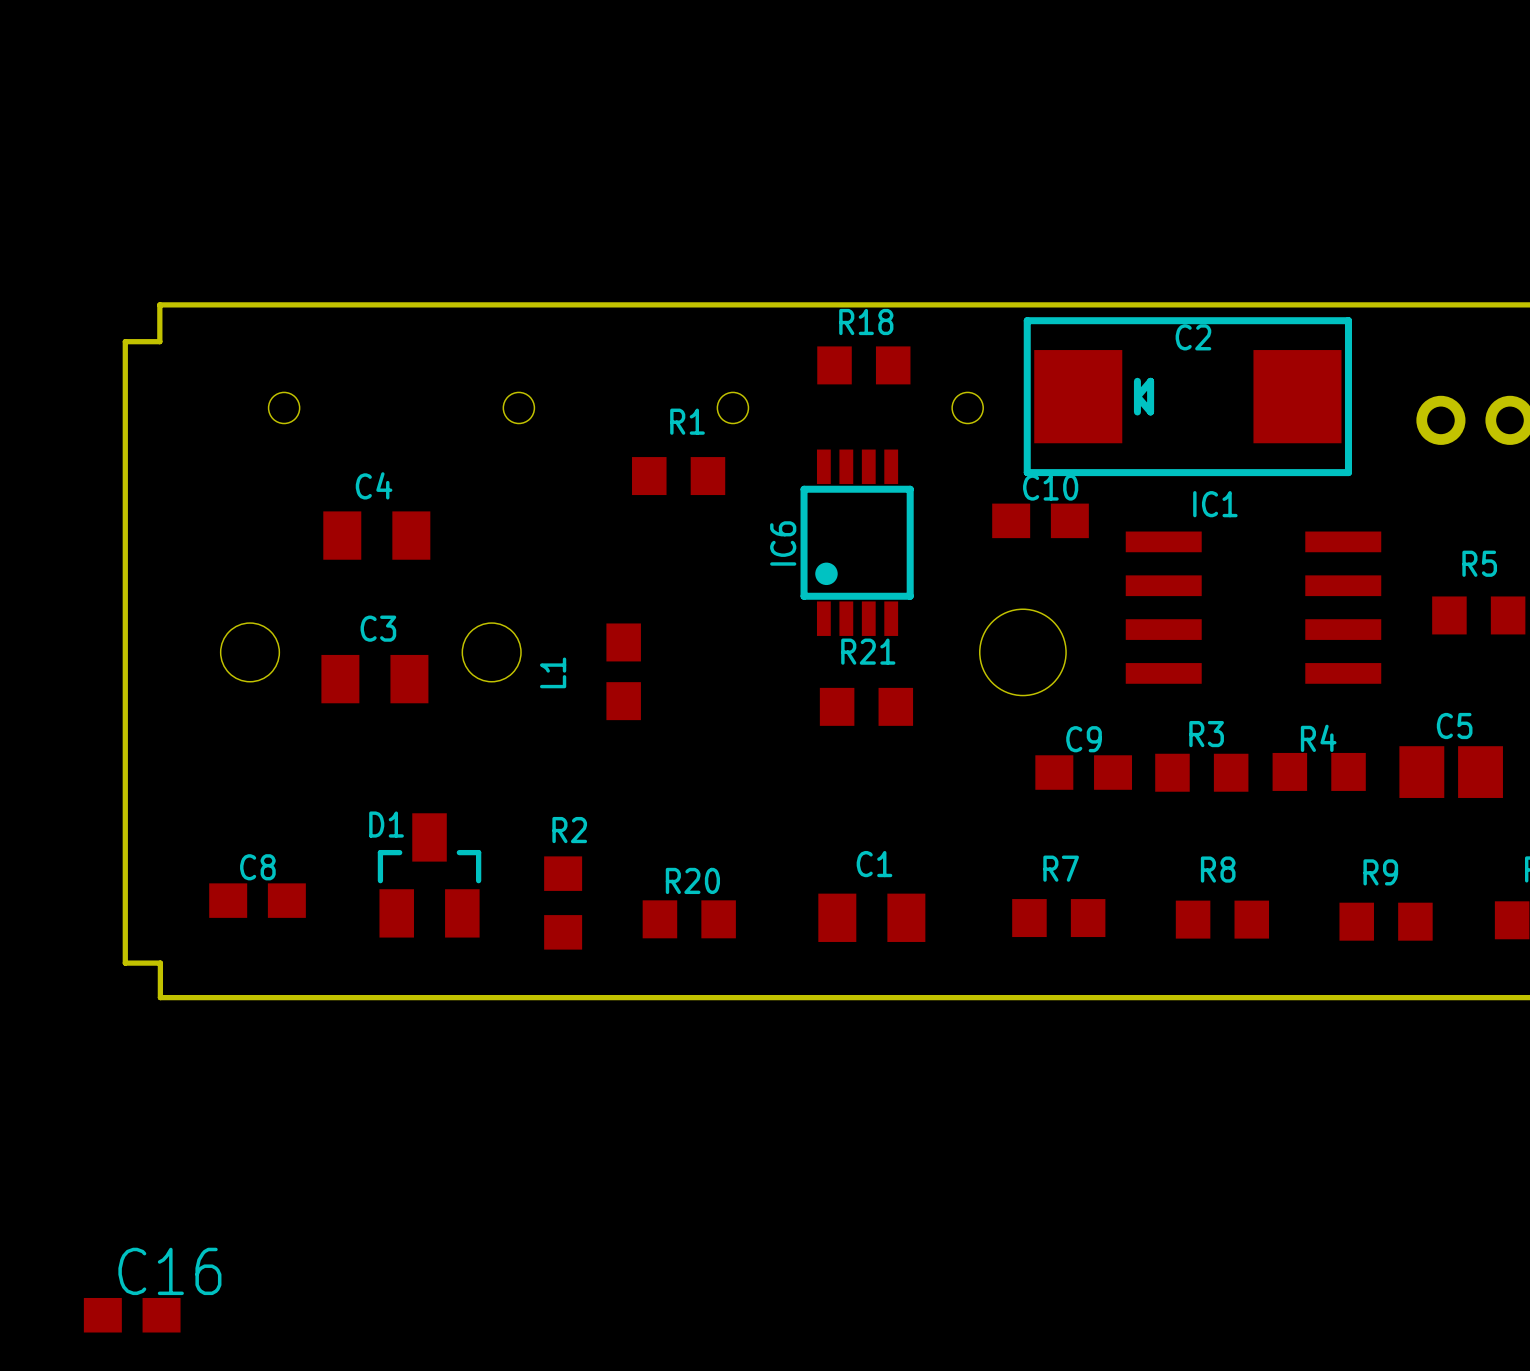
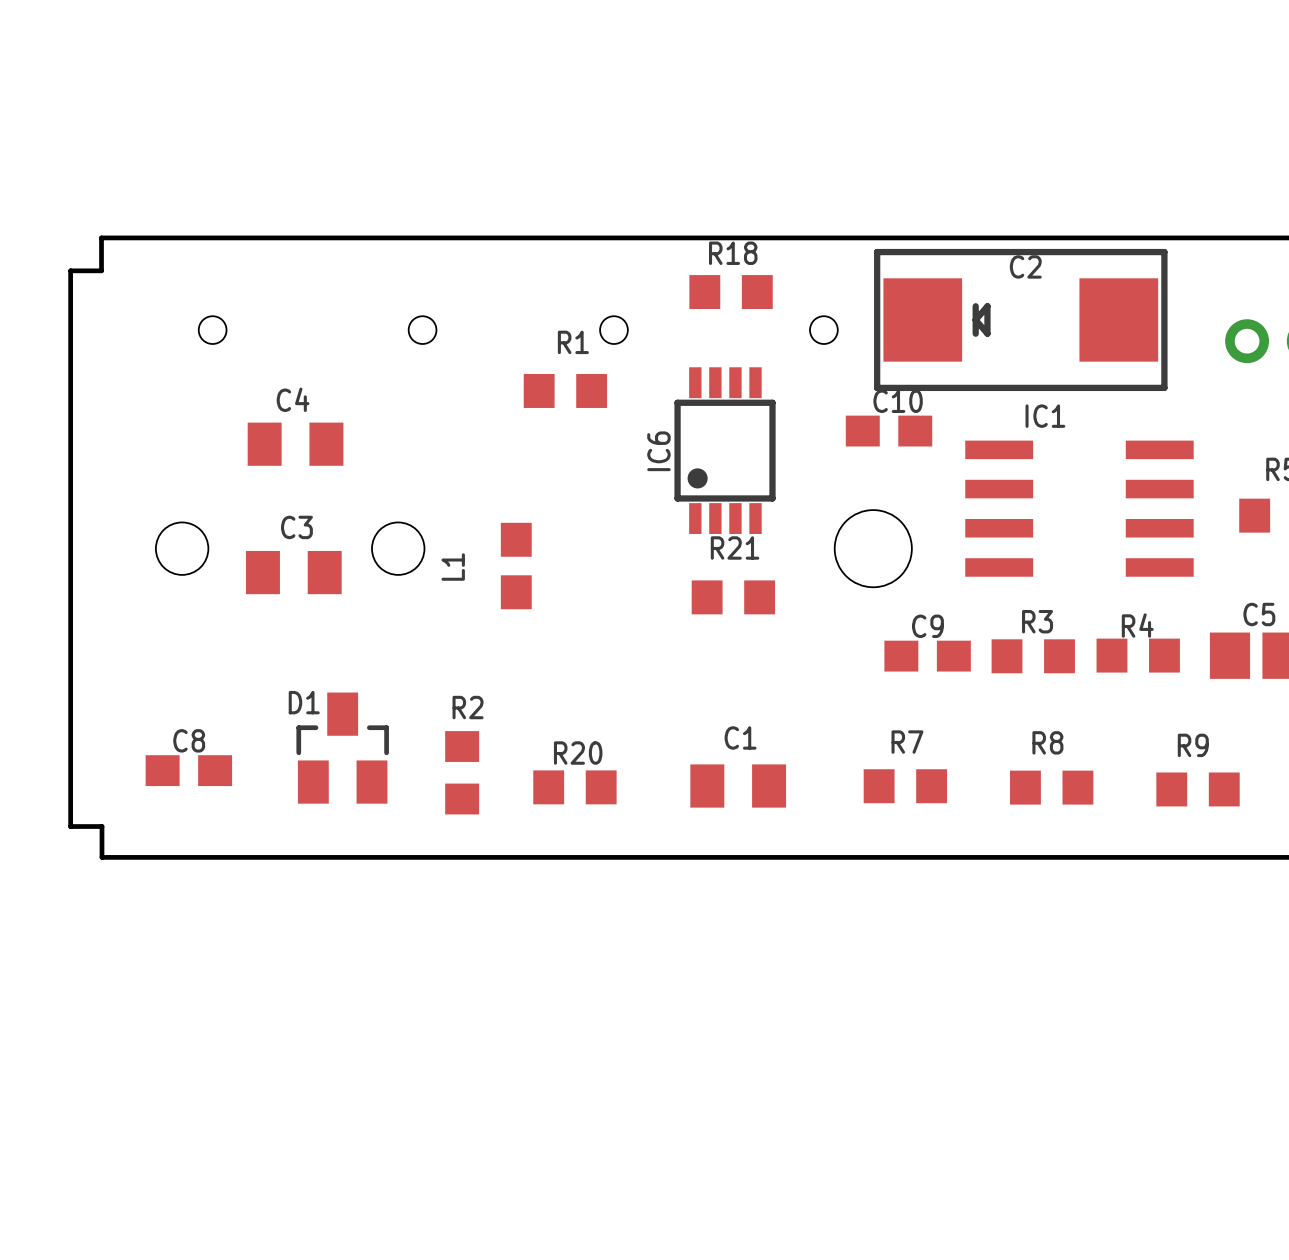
C16: (132, 1315) -> none

